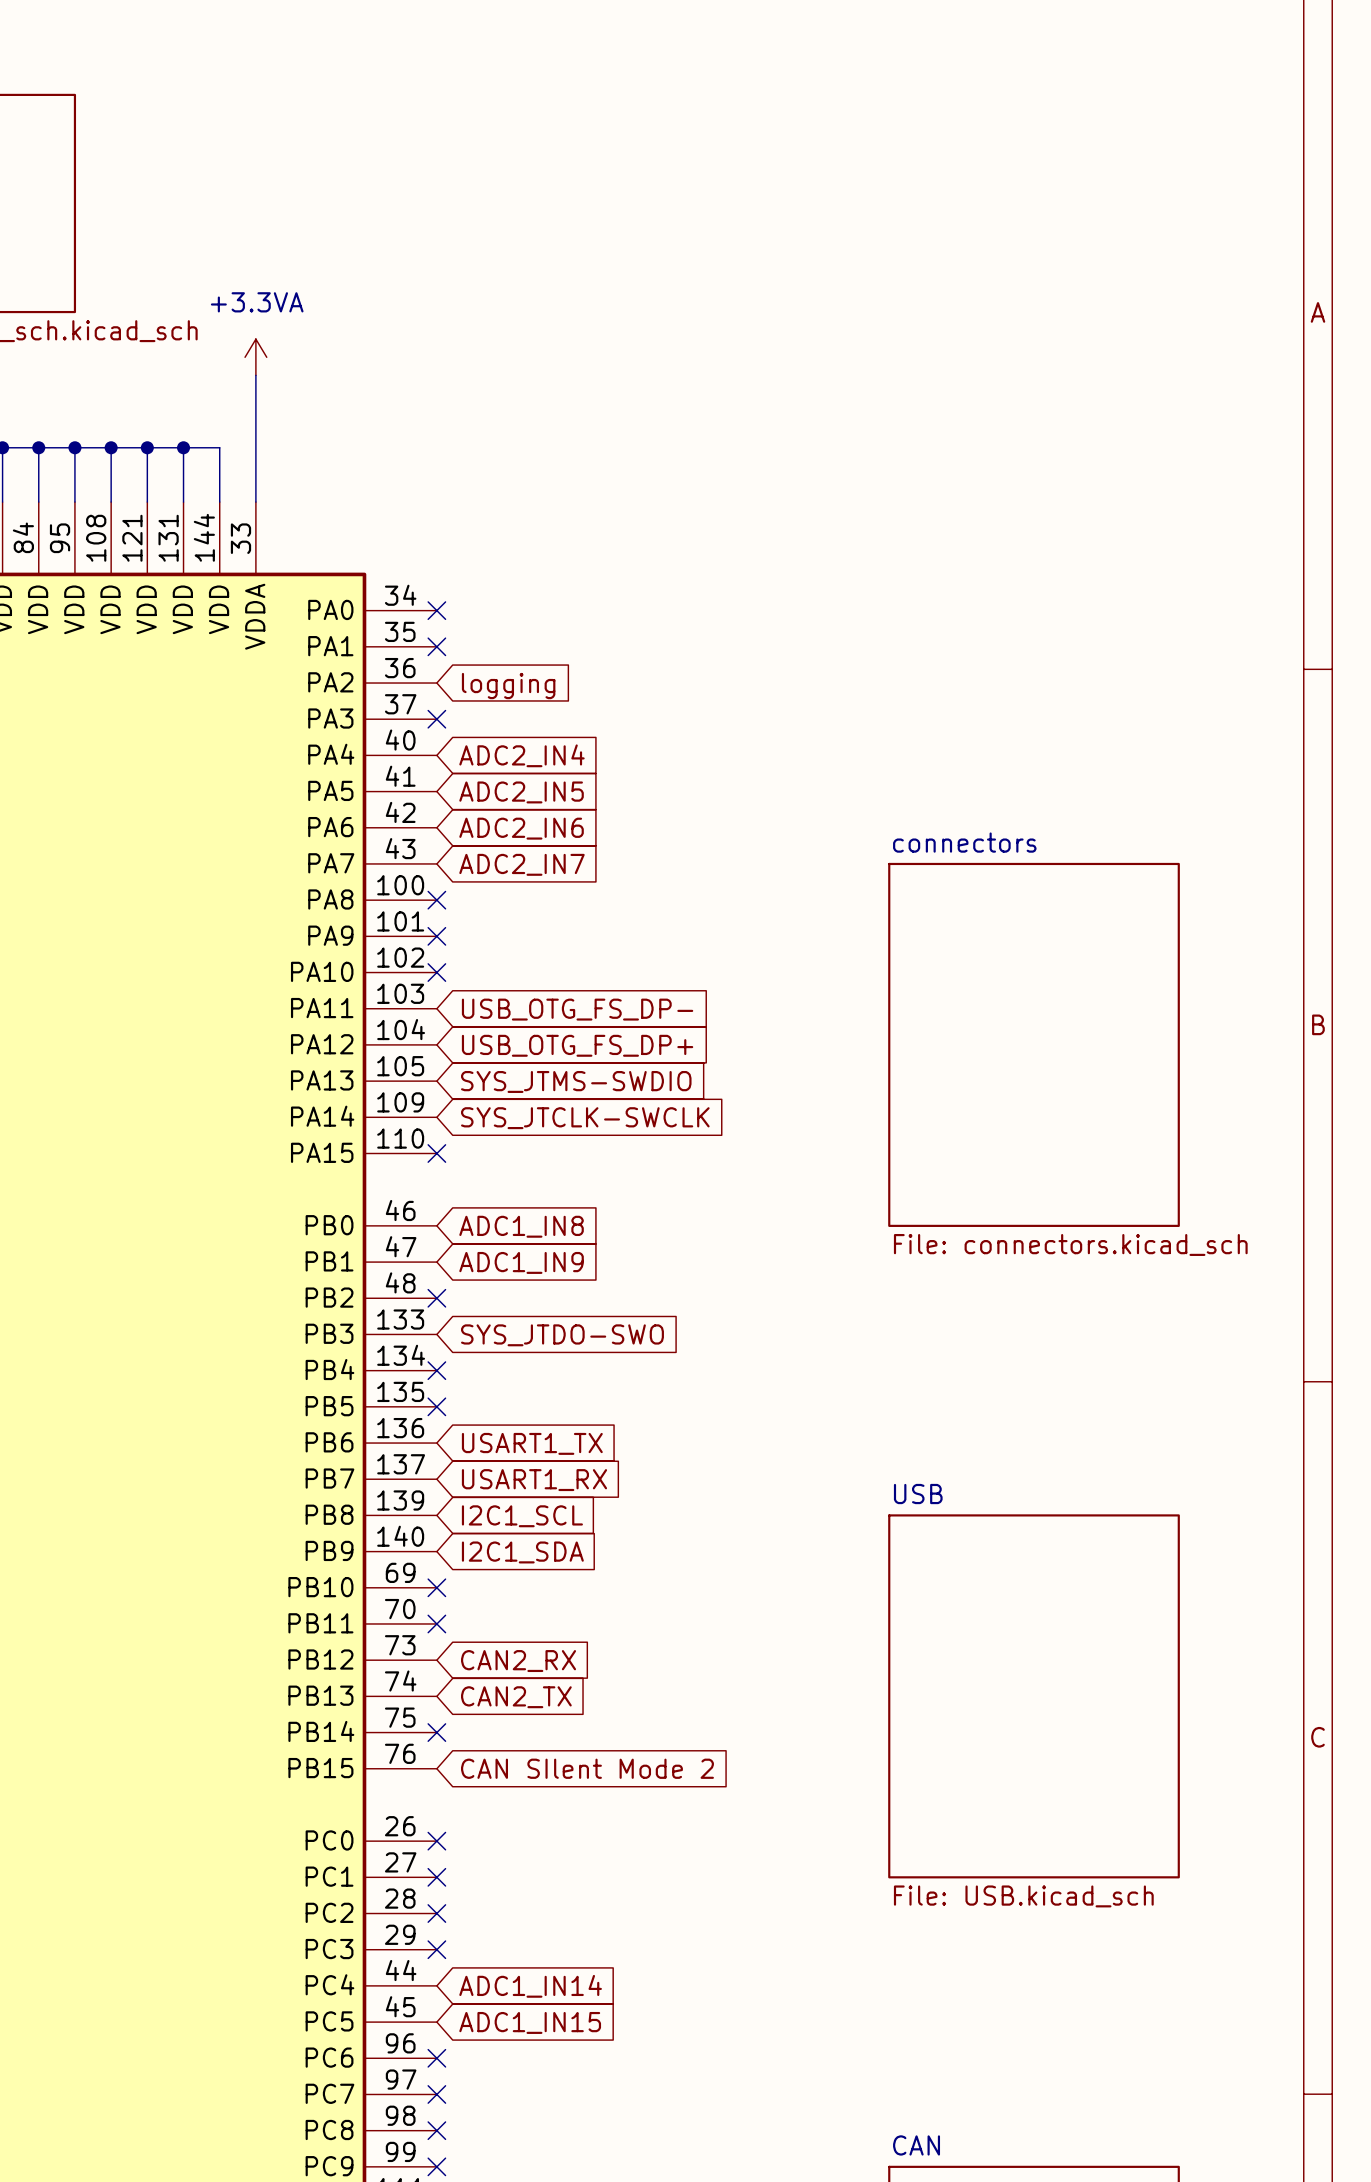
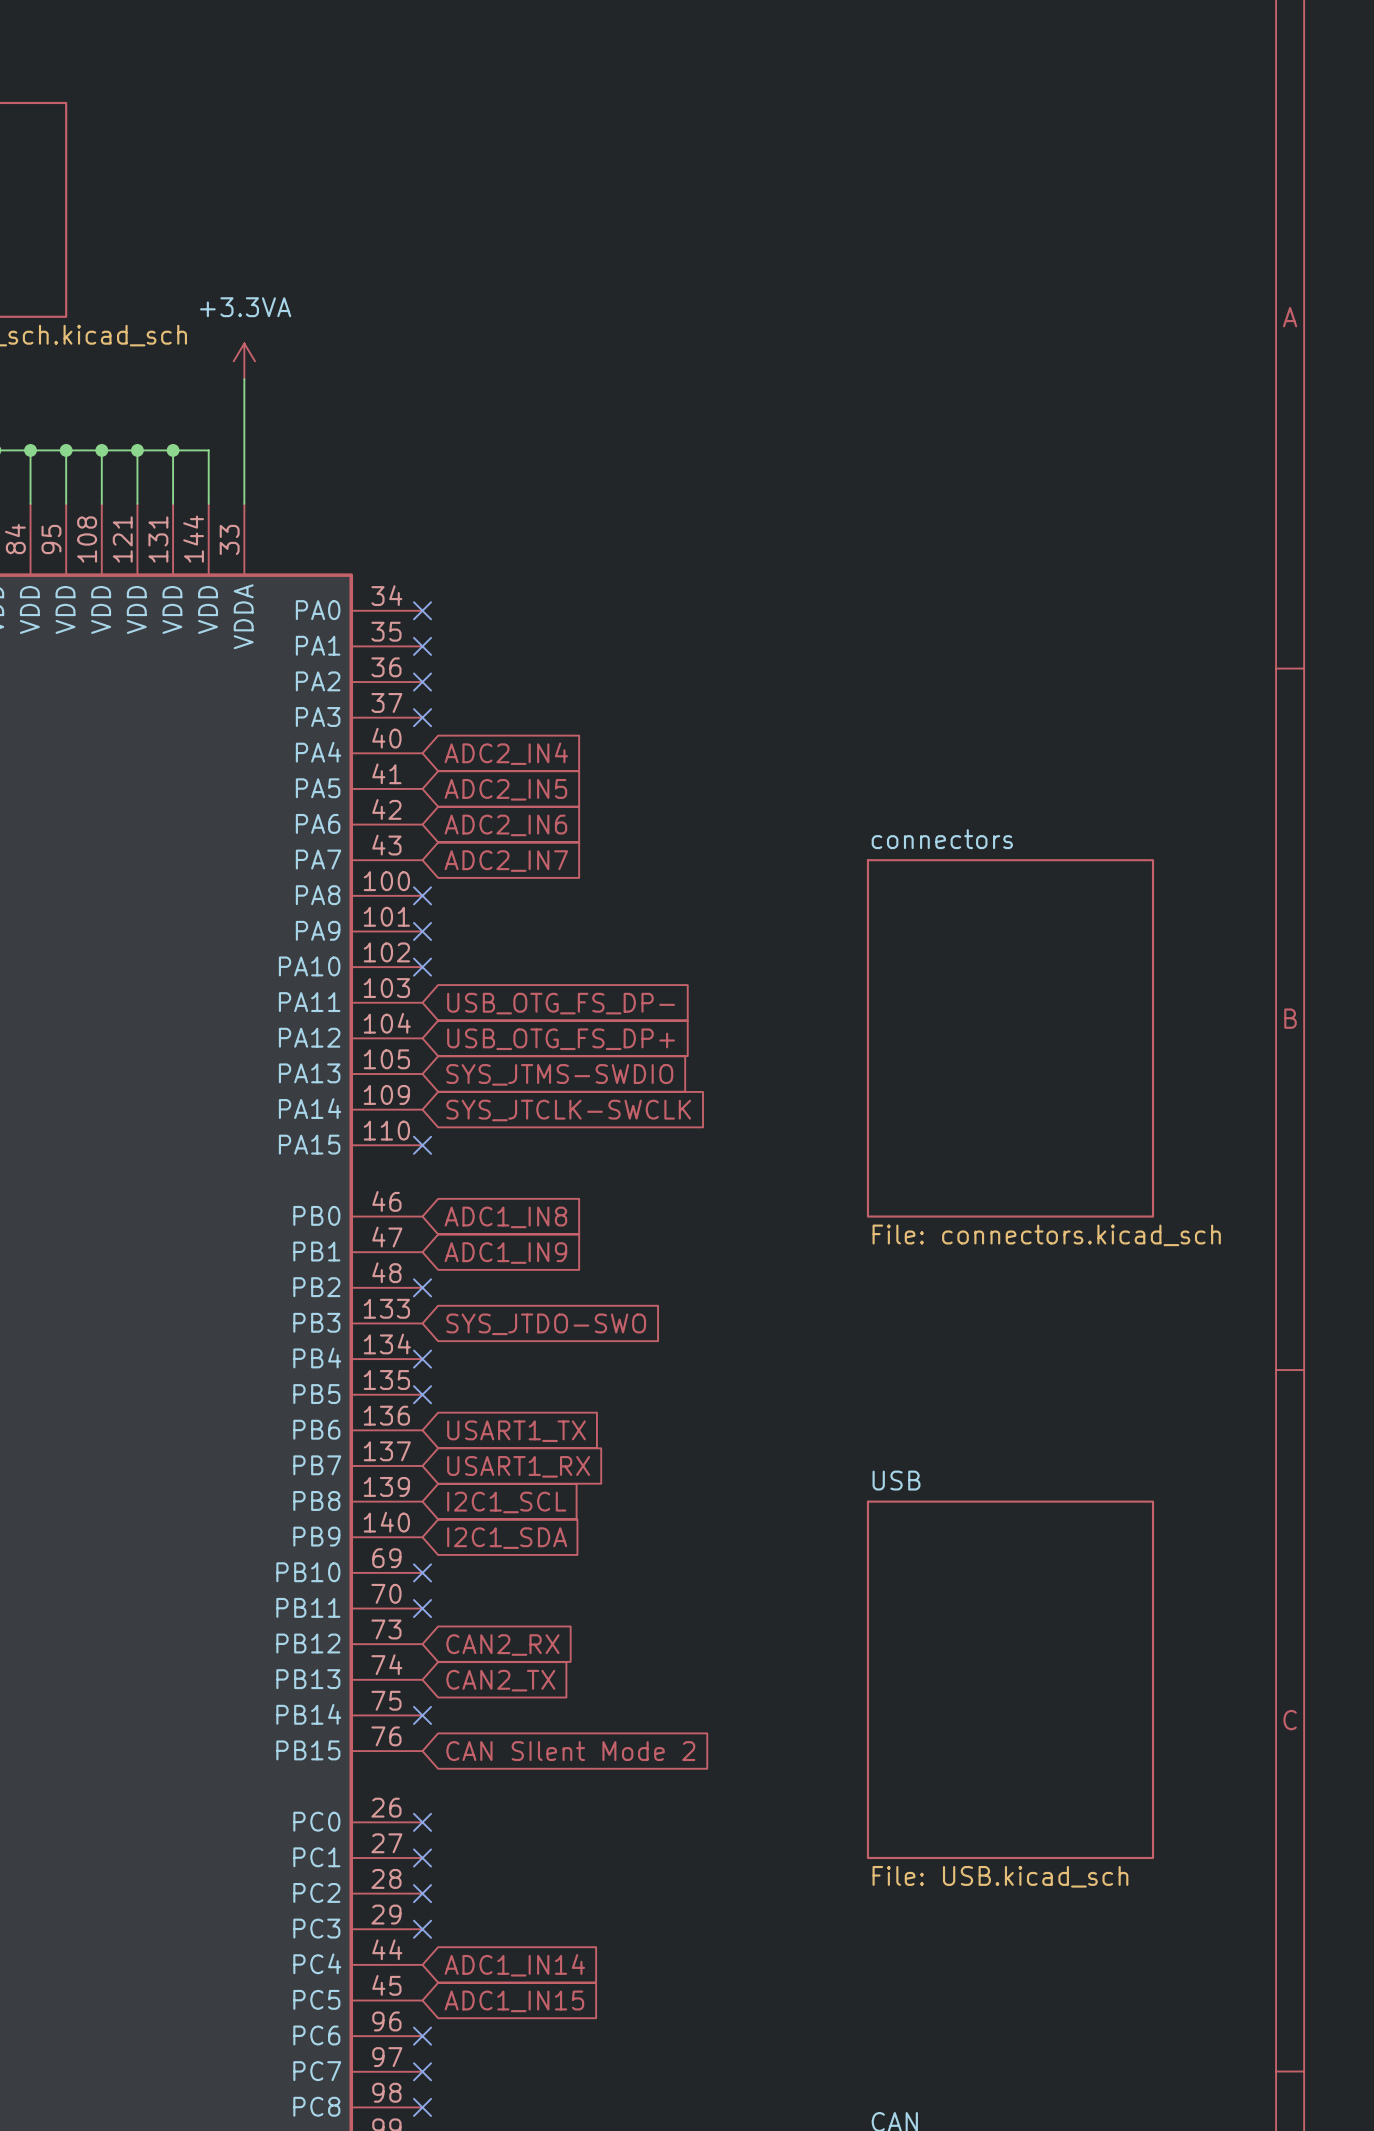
no-connect mark: none -> (422, 682)
global label: logging (508, 686) -> none

